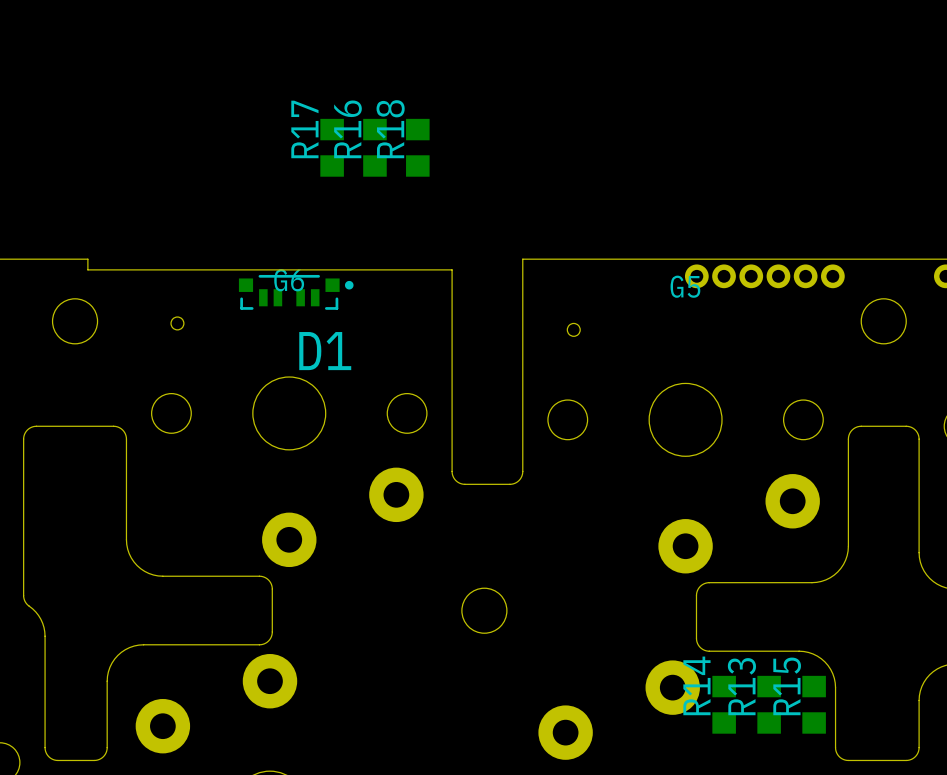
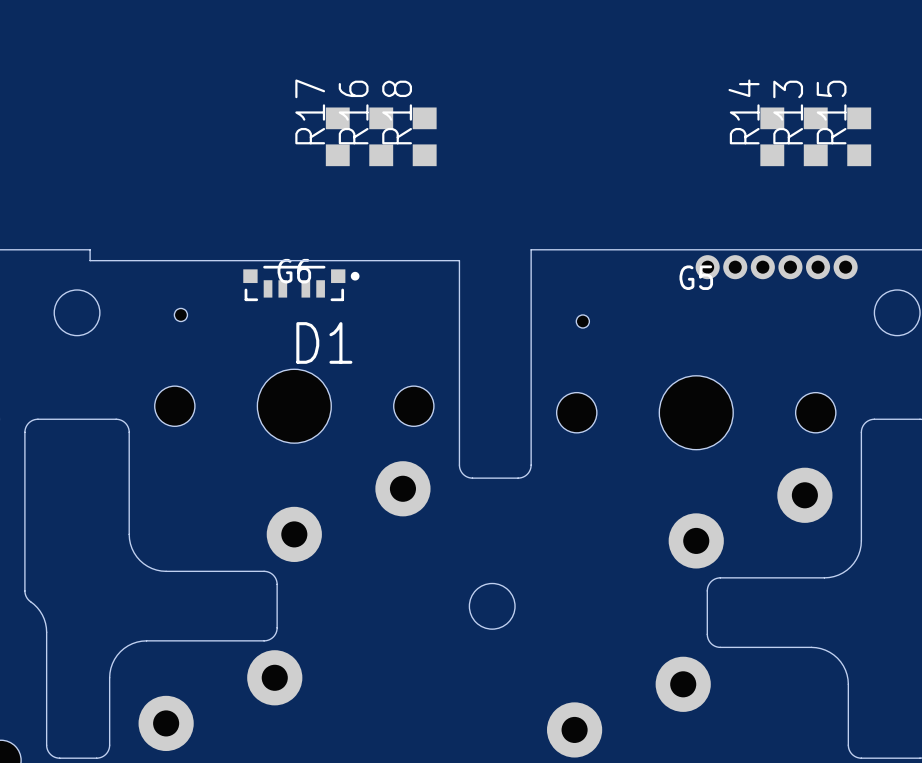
R14 position: (724, 704) -> (772, 136)
R13 position: (769, 704) -> (815, 136)
R15 position: (814, 704) -> (859, 136)

